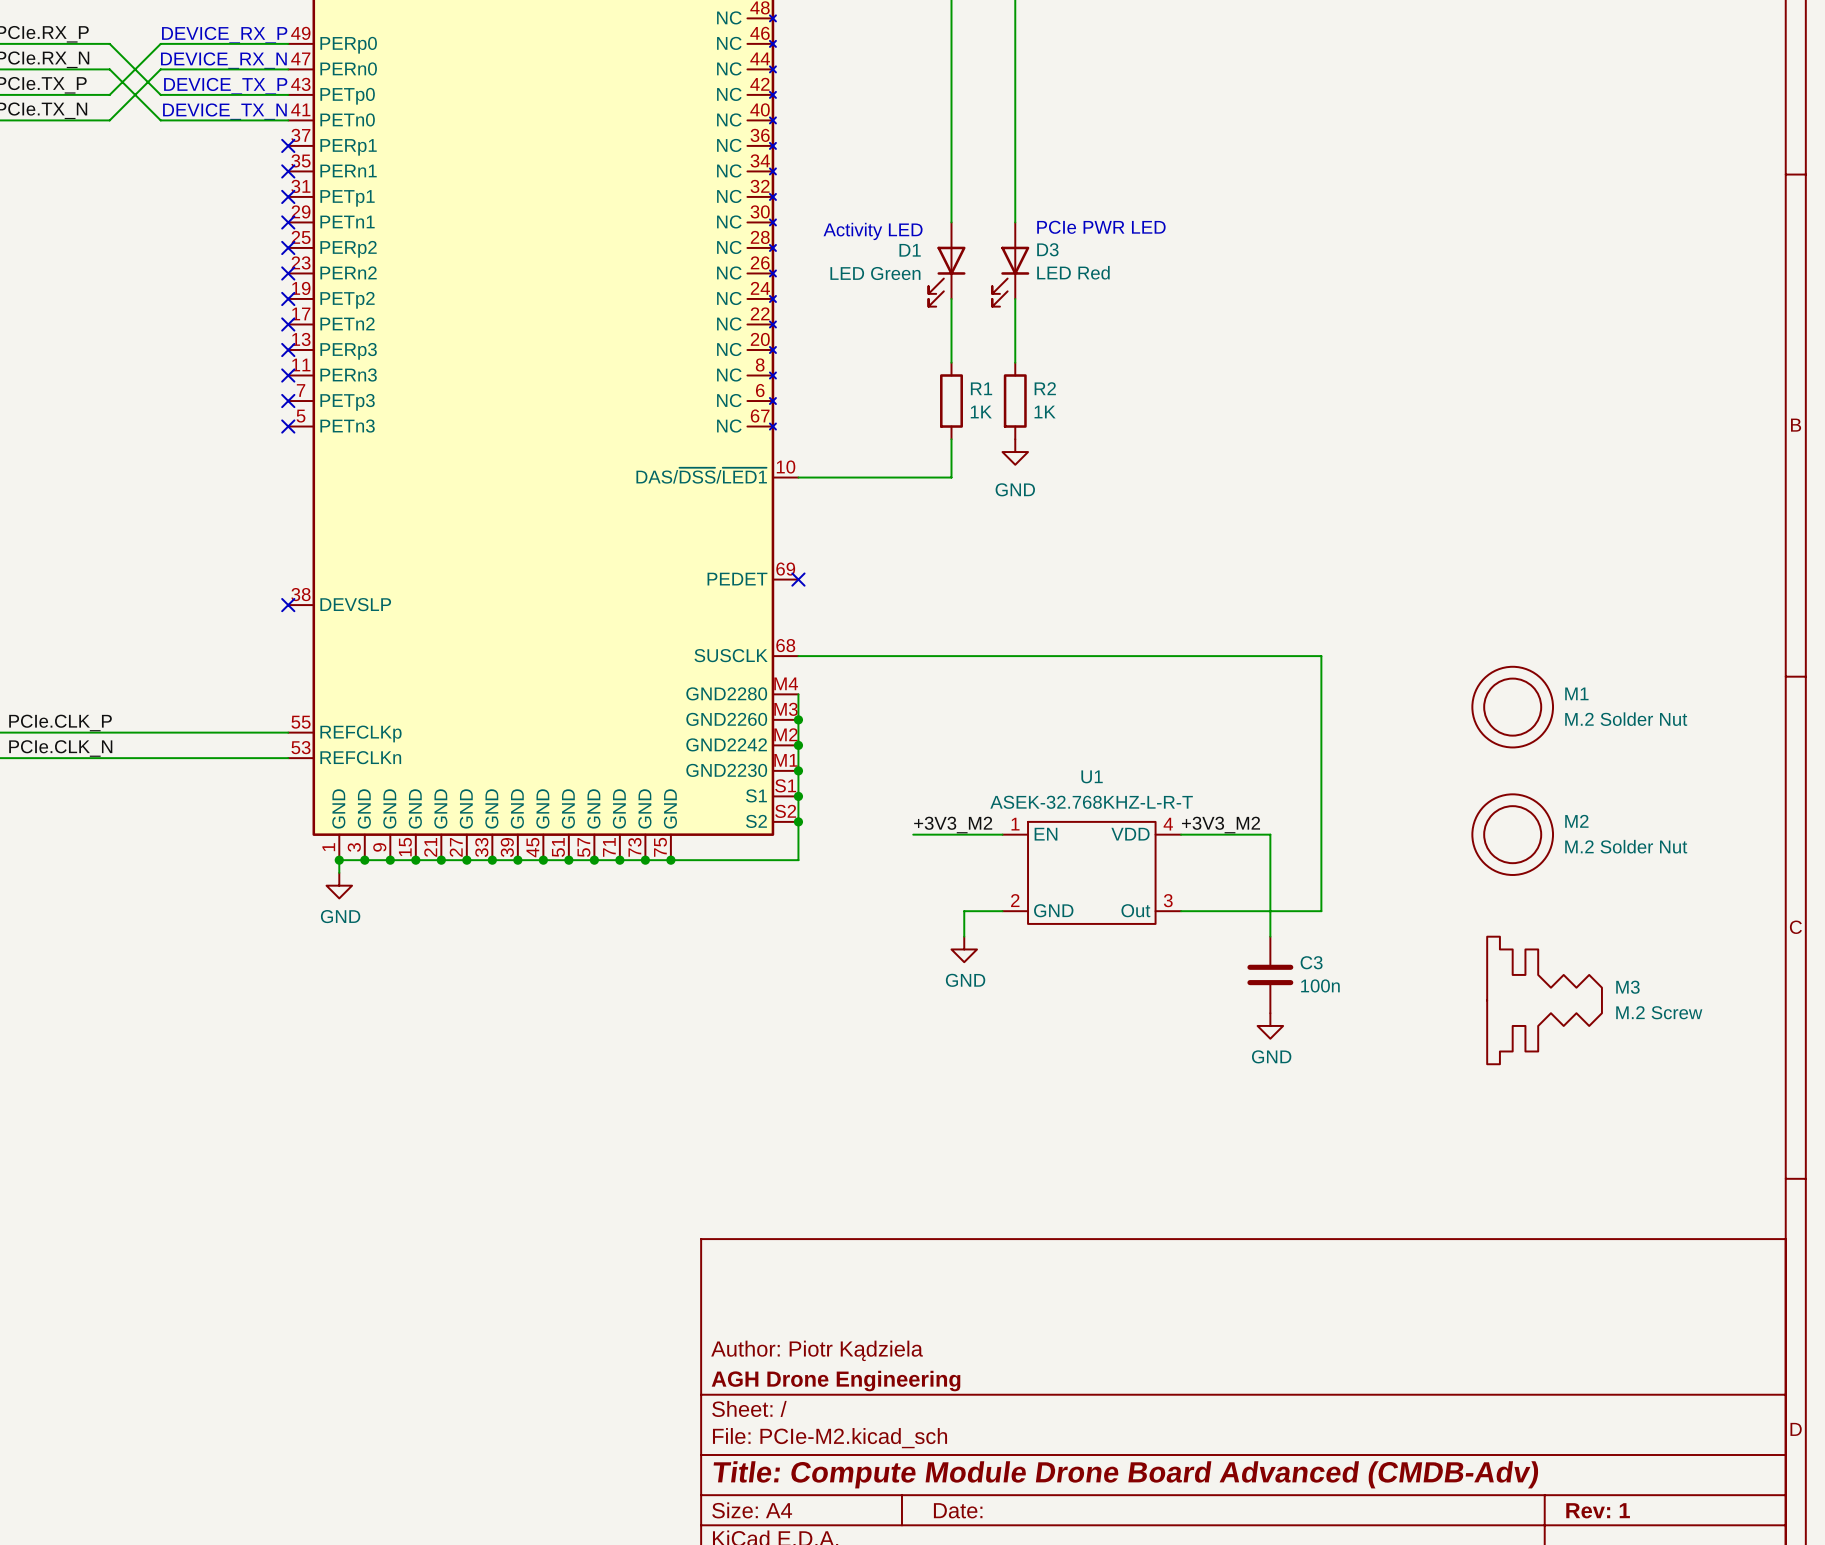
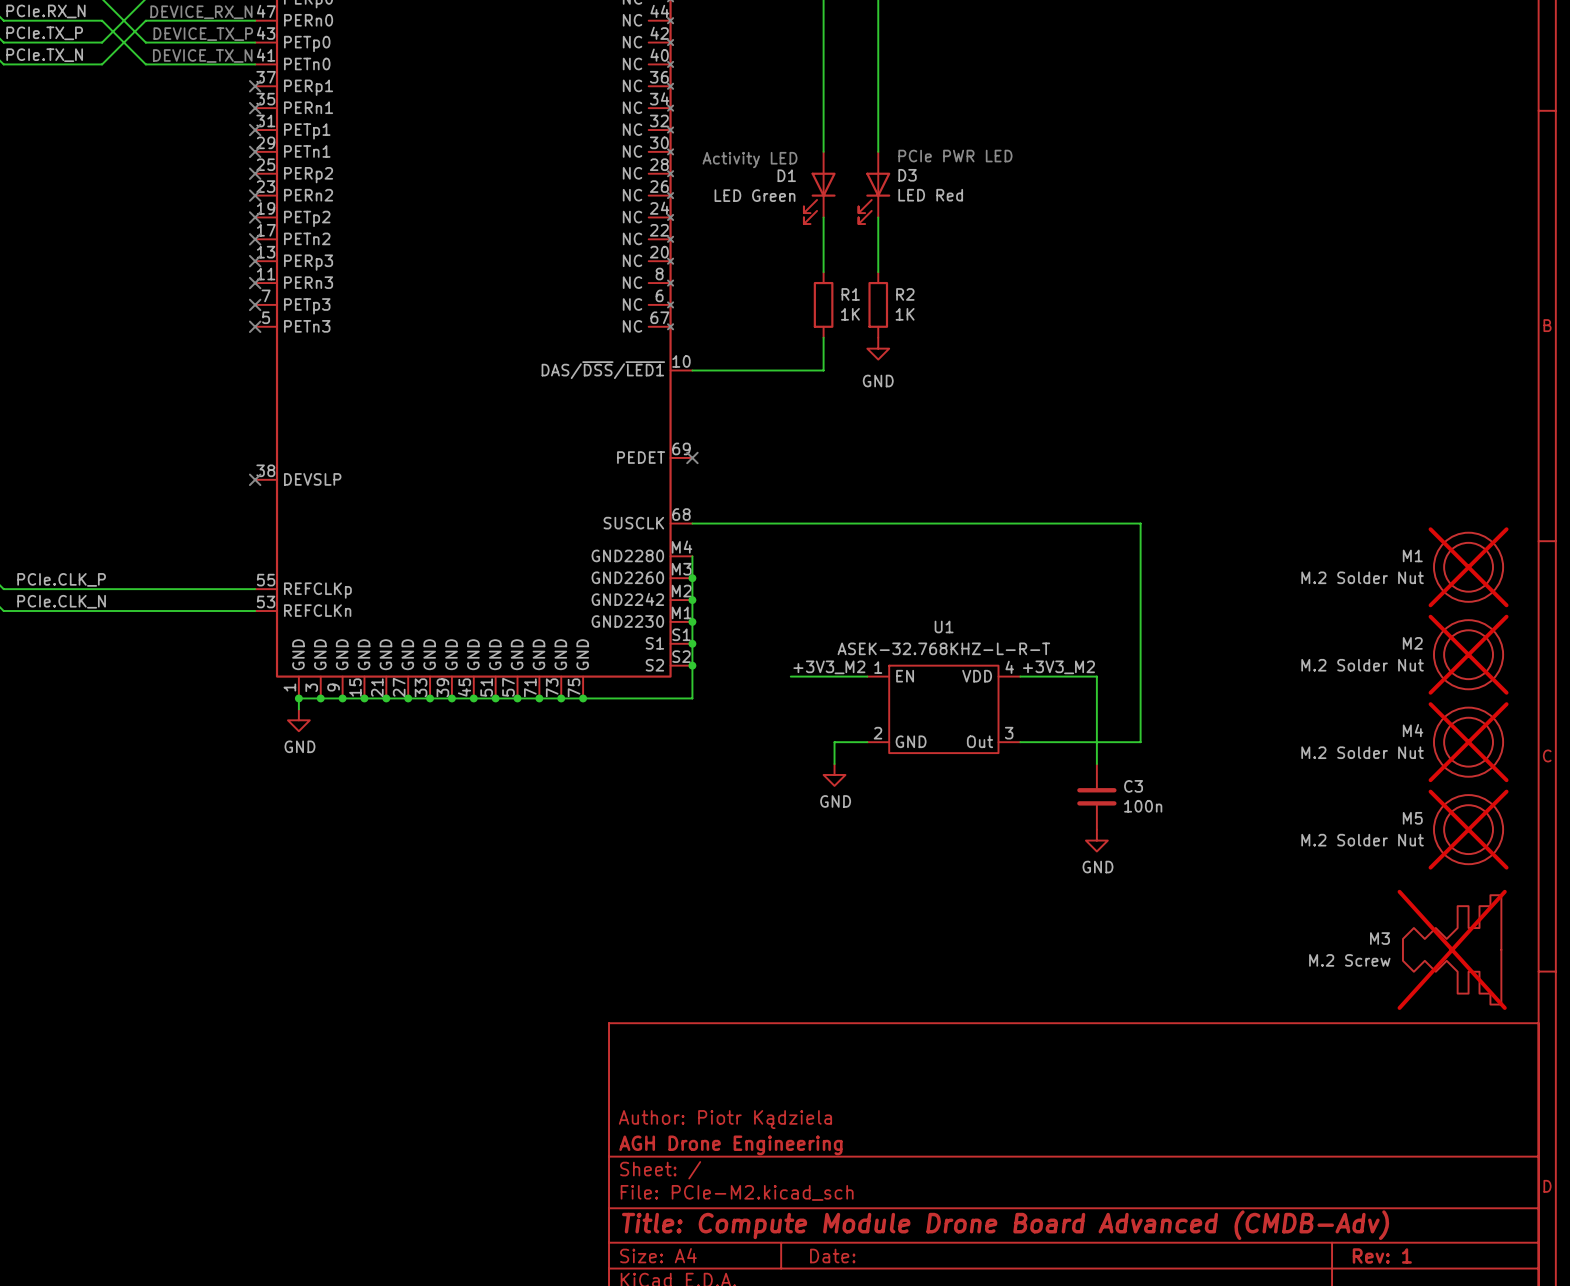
M1 name position: M1 (1576, 693) -> M1 (1412, 555)
M1 position: (1512, 707) -> (1468, 567)
M1 do-not-place cross: none -> (1468, 567)
M1 value position: M.2 Solder Nut (1626, 719) -> M.2 Solder Nut (1362, 577)
M2 do-not-place cross: none -> (1468, 654)
M2 name position: M2 (1576, 821) -> M2 (1412, 643)
M2 position: (1512, 834) -> (1468, 654)
M2 value position: M.2 Solder Nut (1626, 846) -> M.2 Solder Nut (1362, 665)
M4: none -> M.2 Solder Nut (1468, 742)
M3 name position: M3 (1627, 987) -> M3 (1379, 938)
M3 rotation: 0° (1544, 1000) -> 180° (1452, 949)
M3 position: (1544, 1000) -> (1452, 949)
M3 value position: M.2 Screw (1659, 1012) -> M.2 Screw (1349, 960)
M5: none -> M.2 Solder Nut (1468, 829)
M3 do-not-place cross: none -> (1452, 949)

